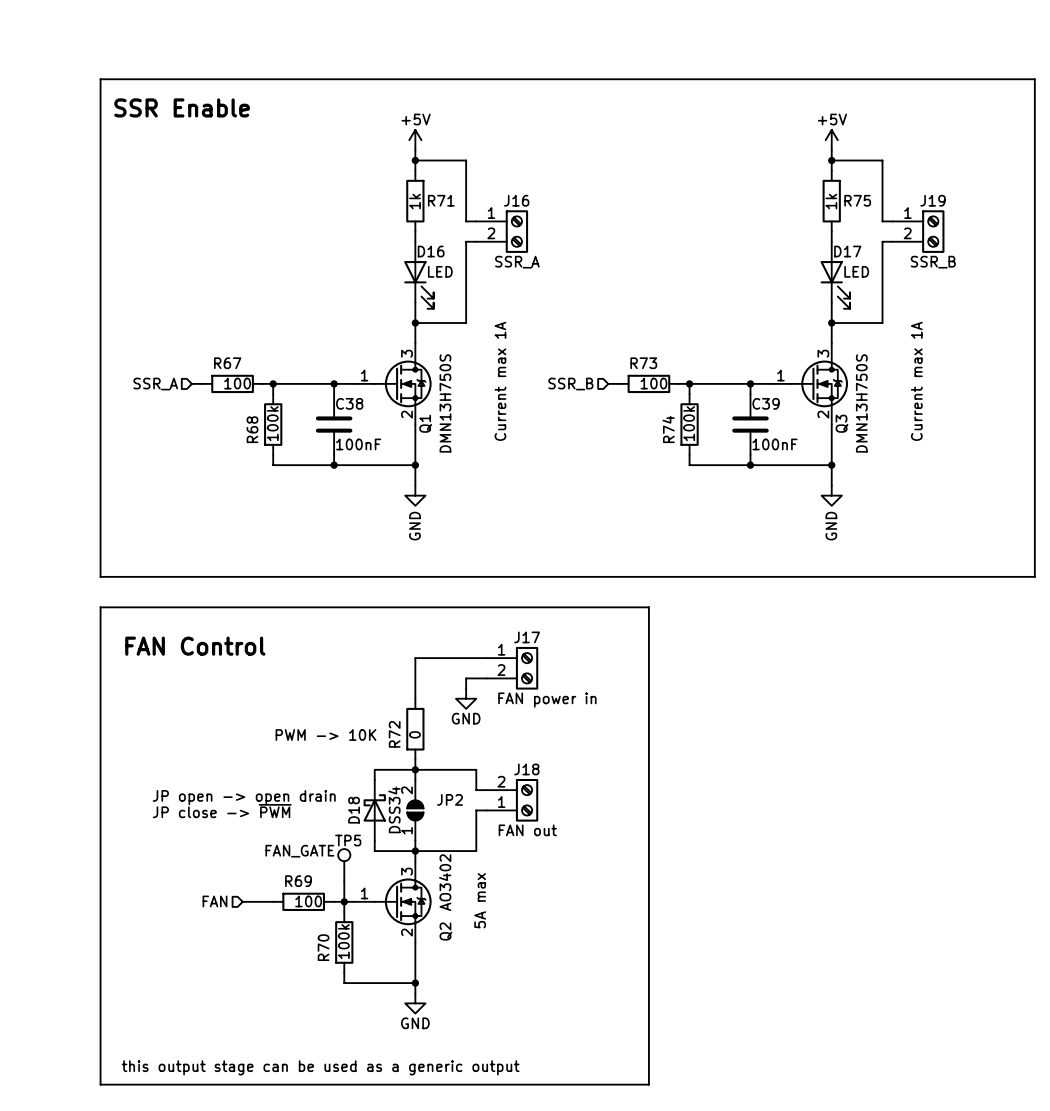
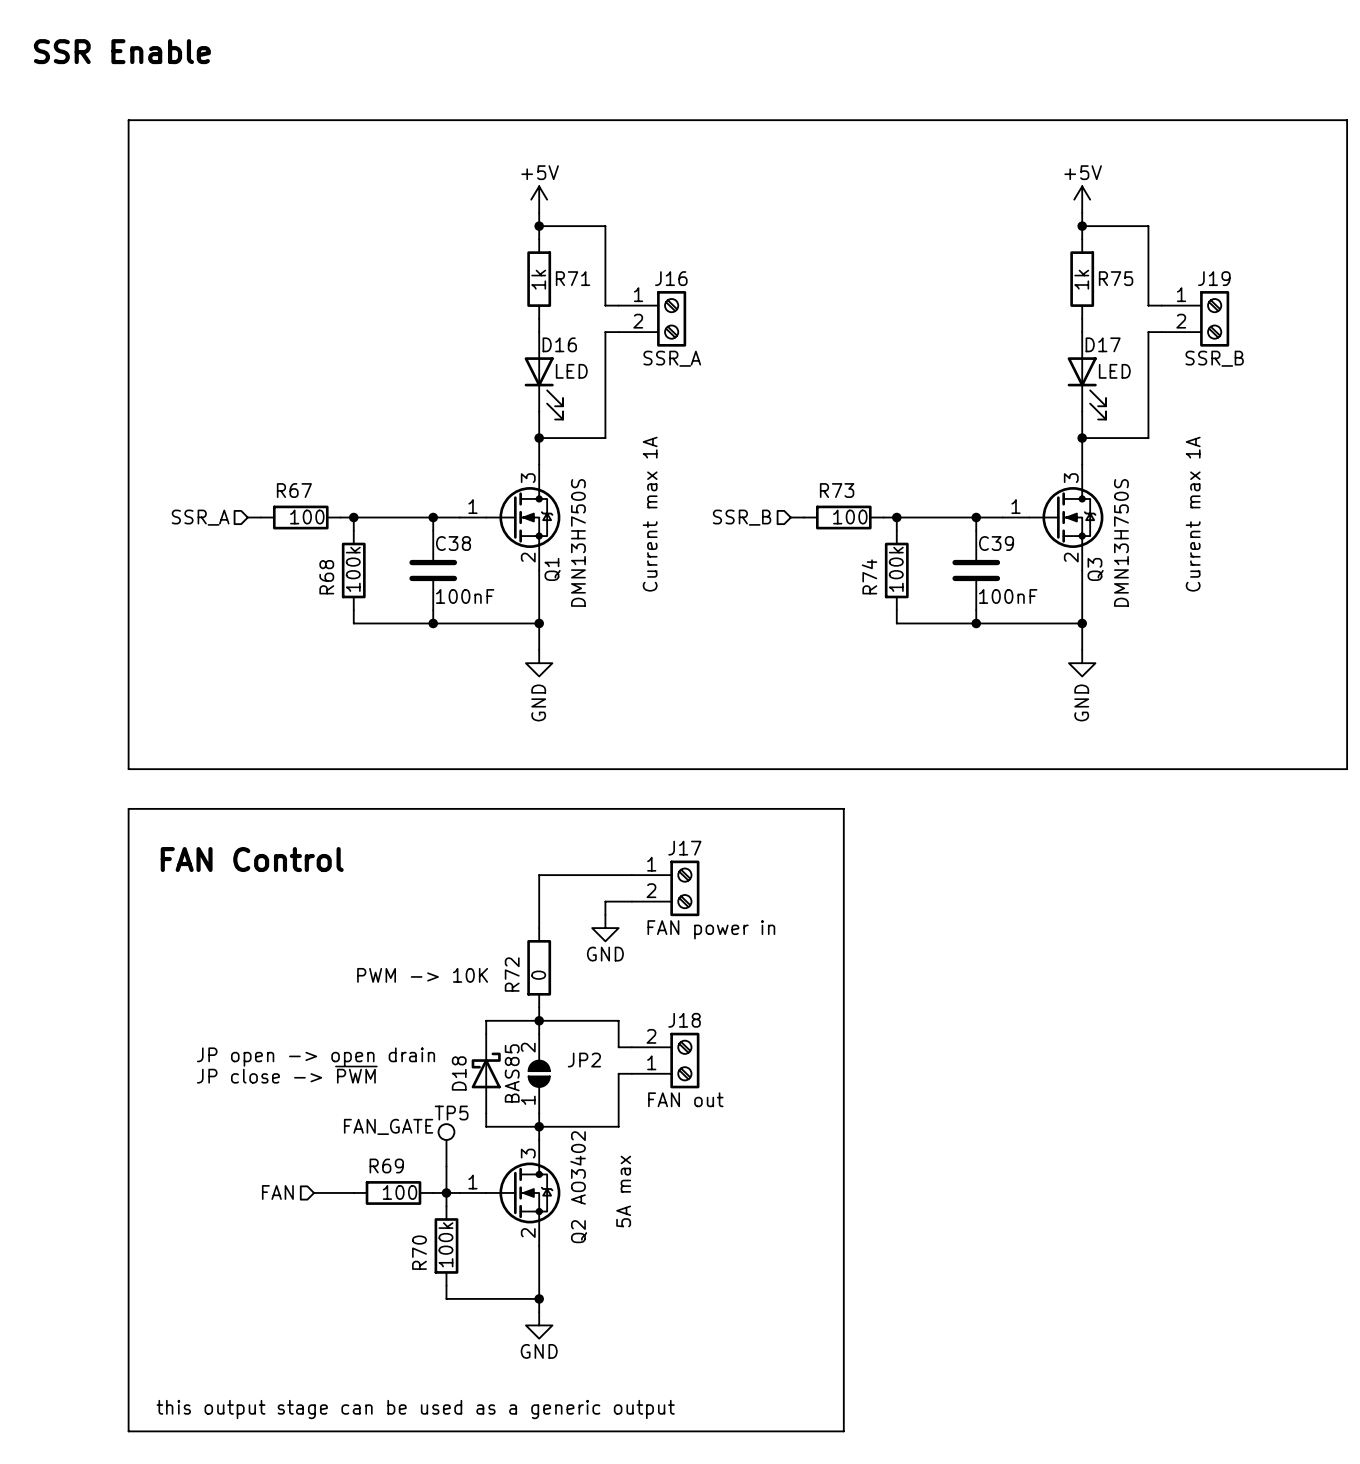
text position: SSR Enable (182, 107) -> SSR Enable (122, 51)
D18 value: DSS34 (394, 809) -> BAS85 (512, 1073)

